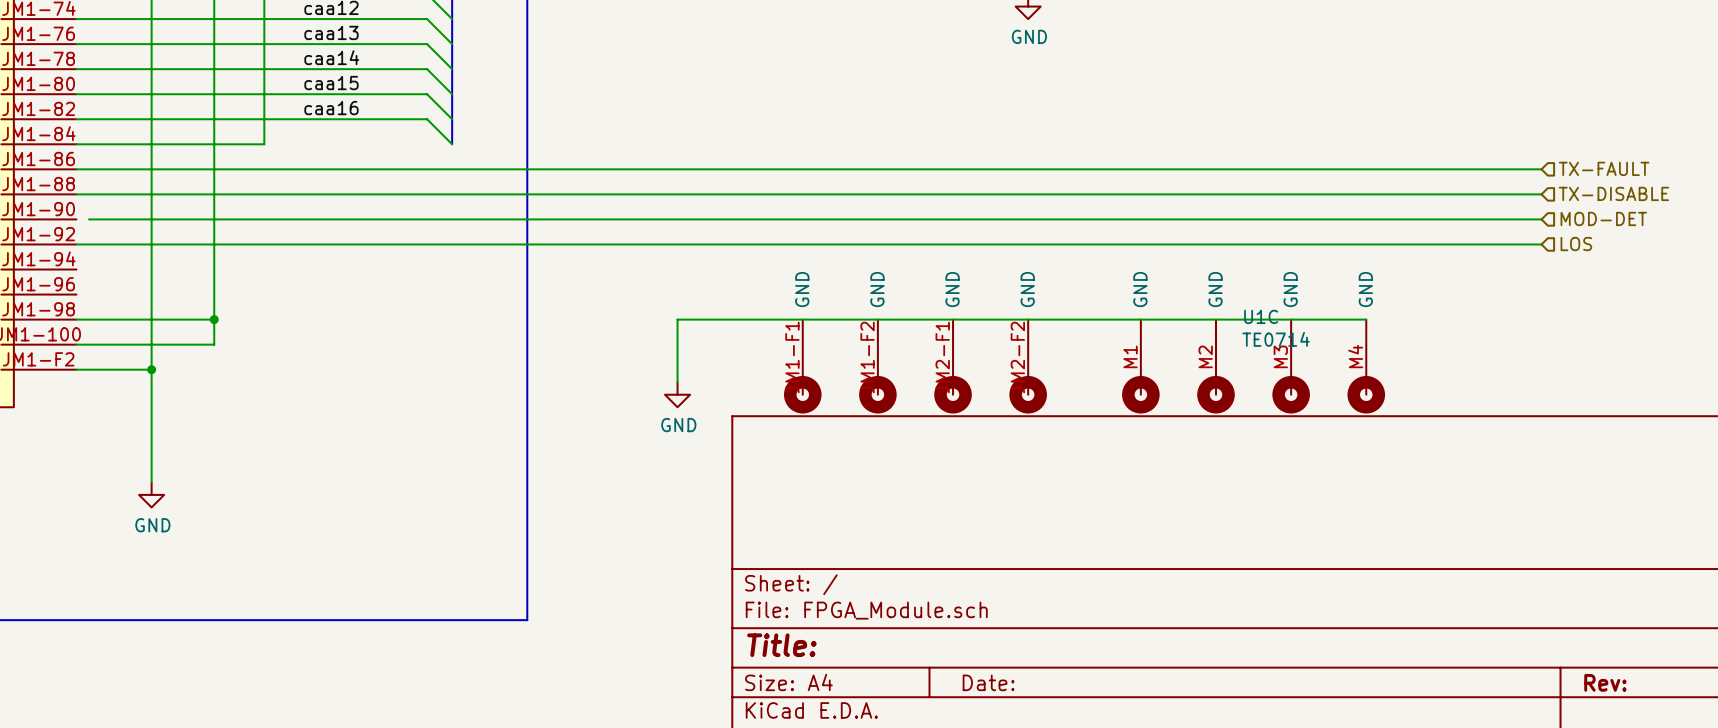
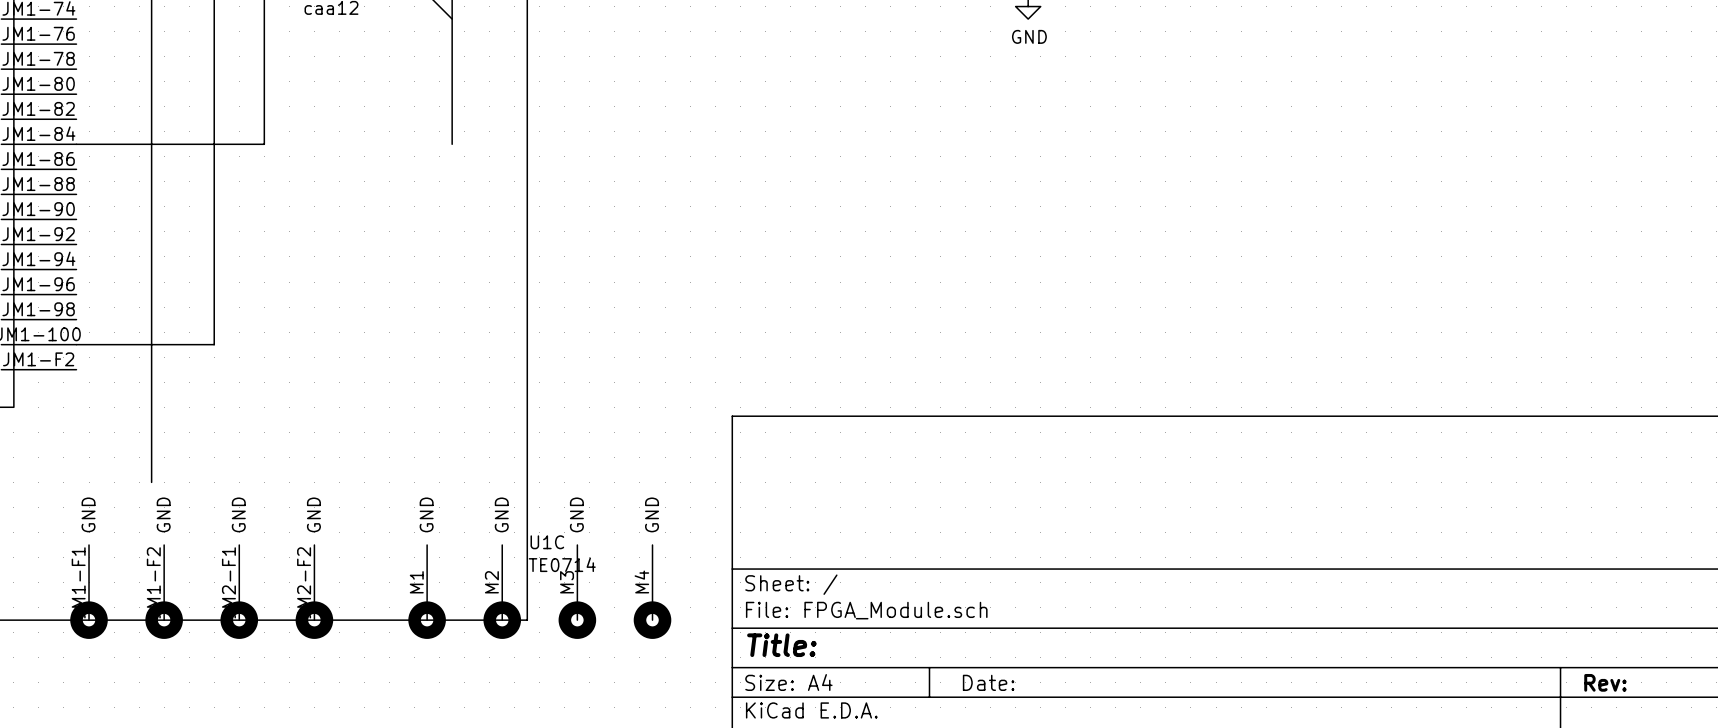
wire: (76, 19) (427, 19) (452, 44) -> none
label: caa13 (331, 32) -> none
wire: (76, 44) (427, 44) (452, 69) -> none
label: caa14 (331, 57) -> none
wire: (76, 69) (427, 69) (452, 94) -> none
label: caa15 (331, 83) -> none
wire: (76, 94) (427, 94) (452, 119) -> none
label: caa16 (331, 108) -> none
wire: (76, 119) (427, 119) (452, 144) -> none
hierarchical label: TX-FAULT (1604, 168) -> none
wire: (76, 169) (1541, 169) -> none
hierarchical label: TX-DISABLE (1613, 193) -> none
wire: (76, 194) (1541, 194) -> none
hierarchical label: MOD-DET (1603, 218) -> none
wire: (89, 219) (1541, 219) -> none
wire: (76, 244) (1541, 244) -> none
hierarchical label: LOS (1576, 244) -> none
wire: (76, 319) (214, 319) -> none
junction: (214, 319) -> none
wire: (1366, 319) (677, 319) (677, 382) -> none
U1C position: (1084, 366) -> (370, 591)
wire: (76, 369) (151, 369) -> none
junction: (151, 369) -> none
power symbol: GND (677, 394) -> none
power symbol: GND (151, 494) -> none

